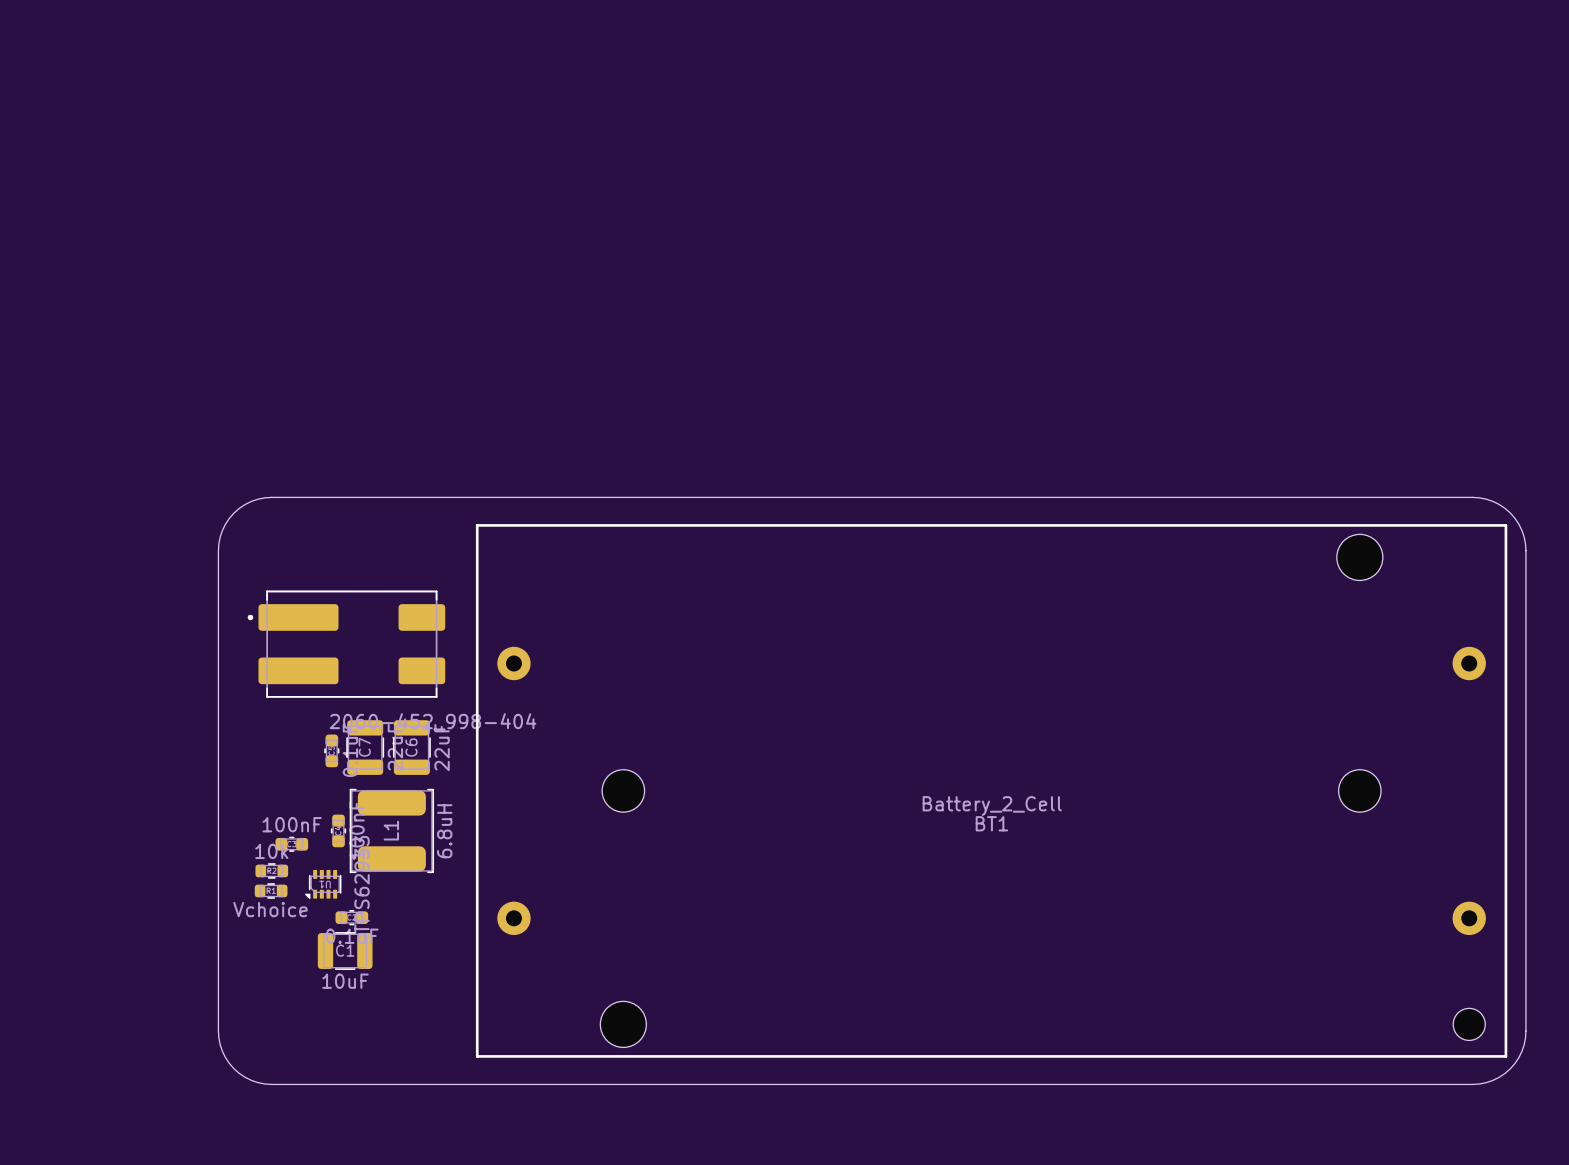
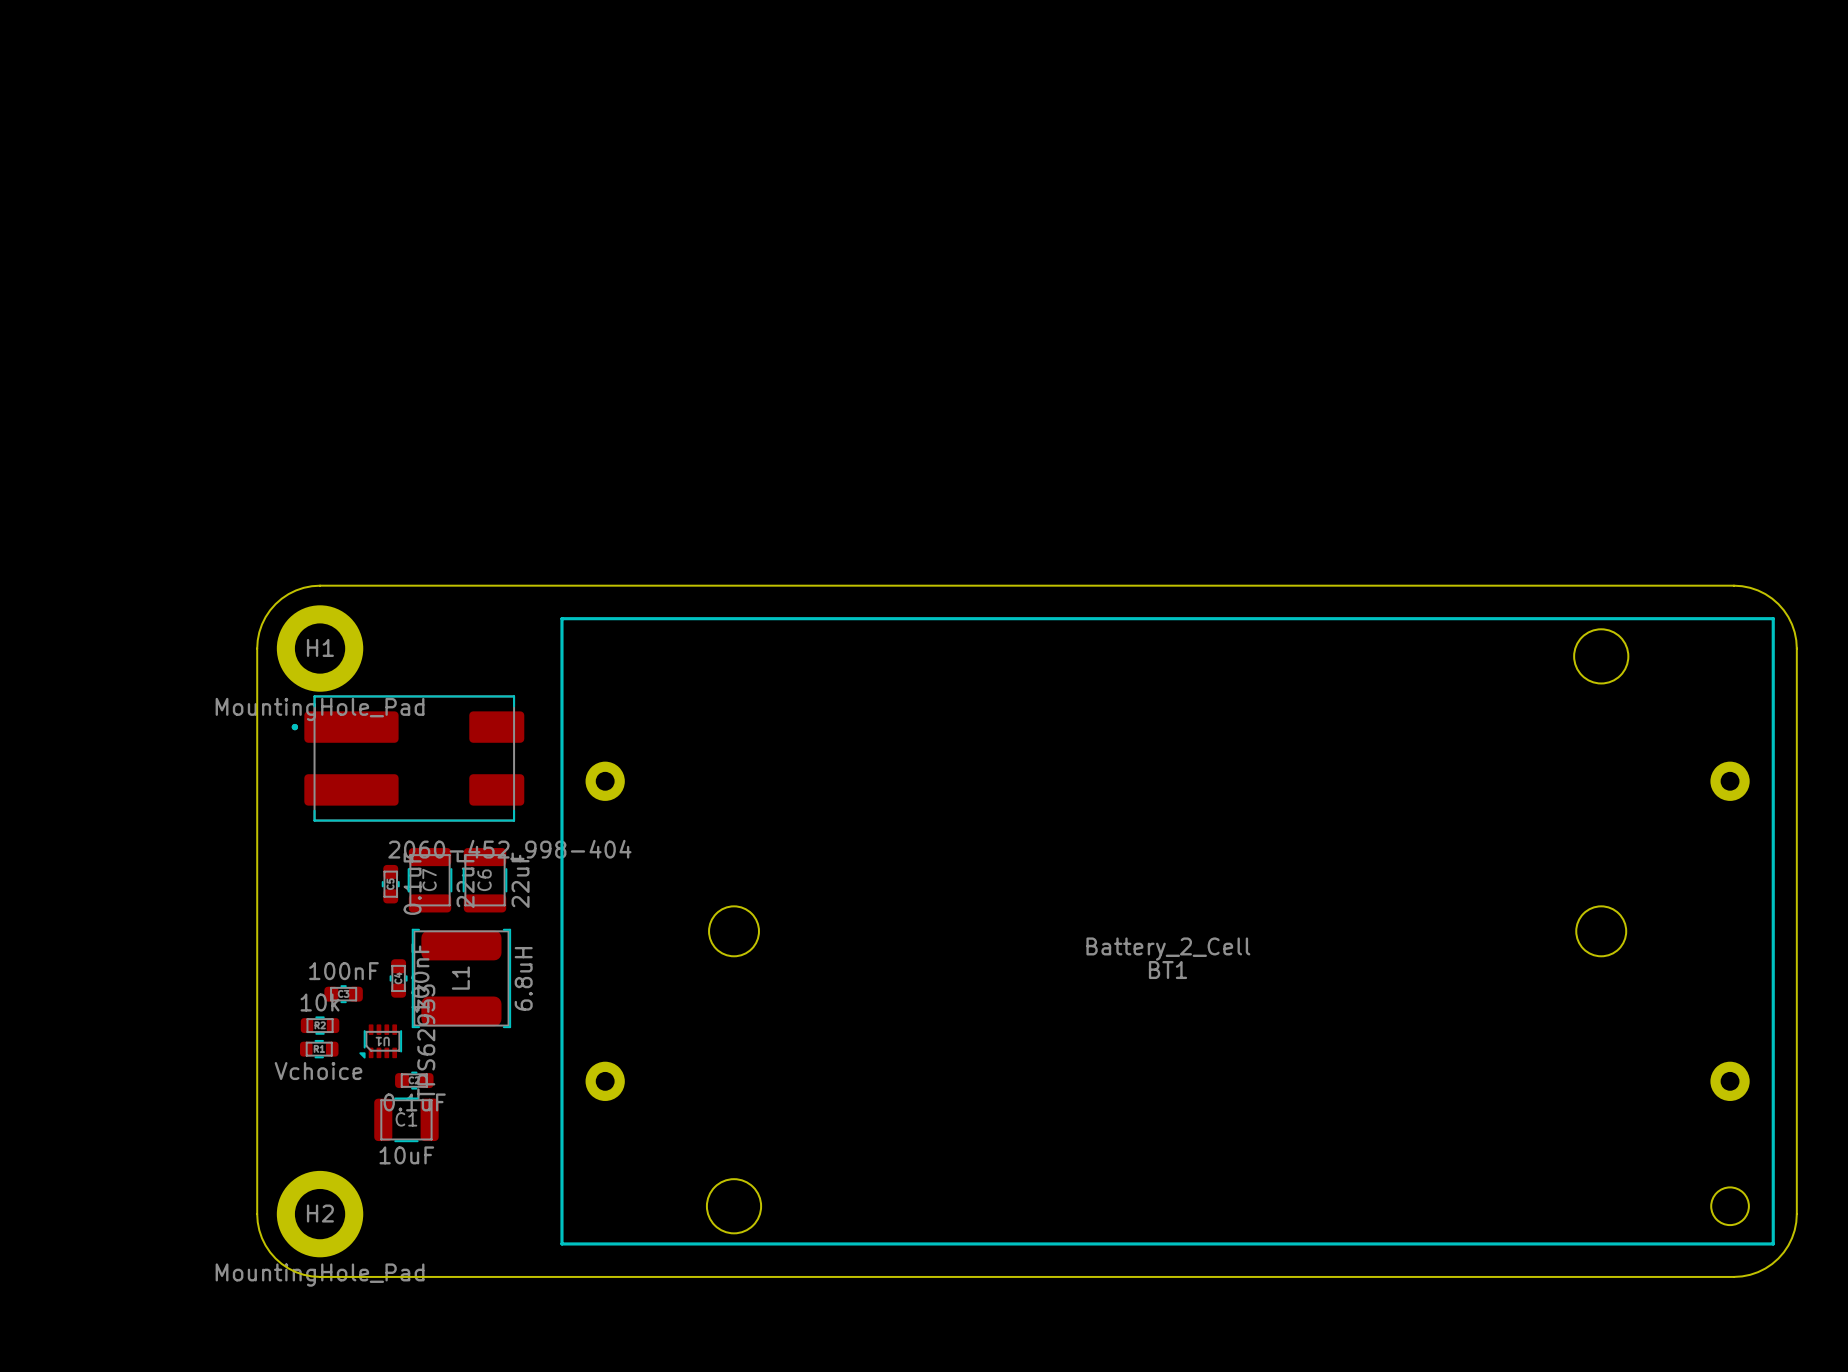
H1: none -> MountingHole_Pad (320, 648)
H2: none -> MountingHole_Pad (320, 1214)

